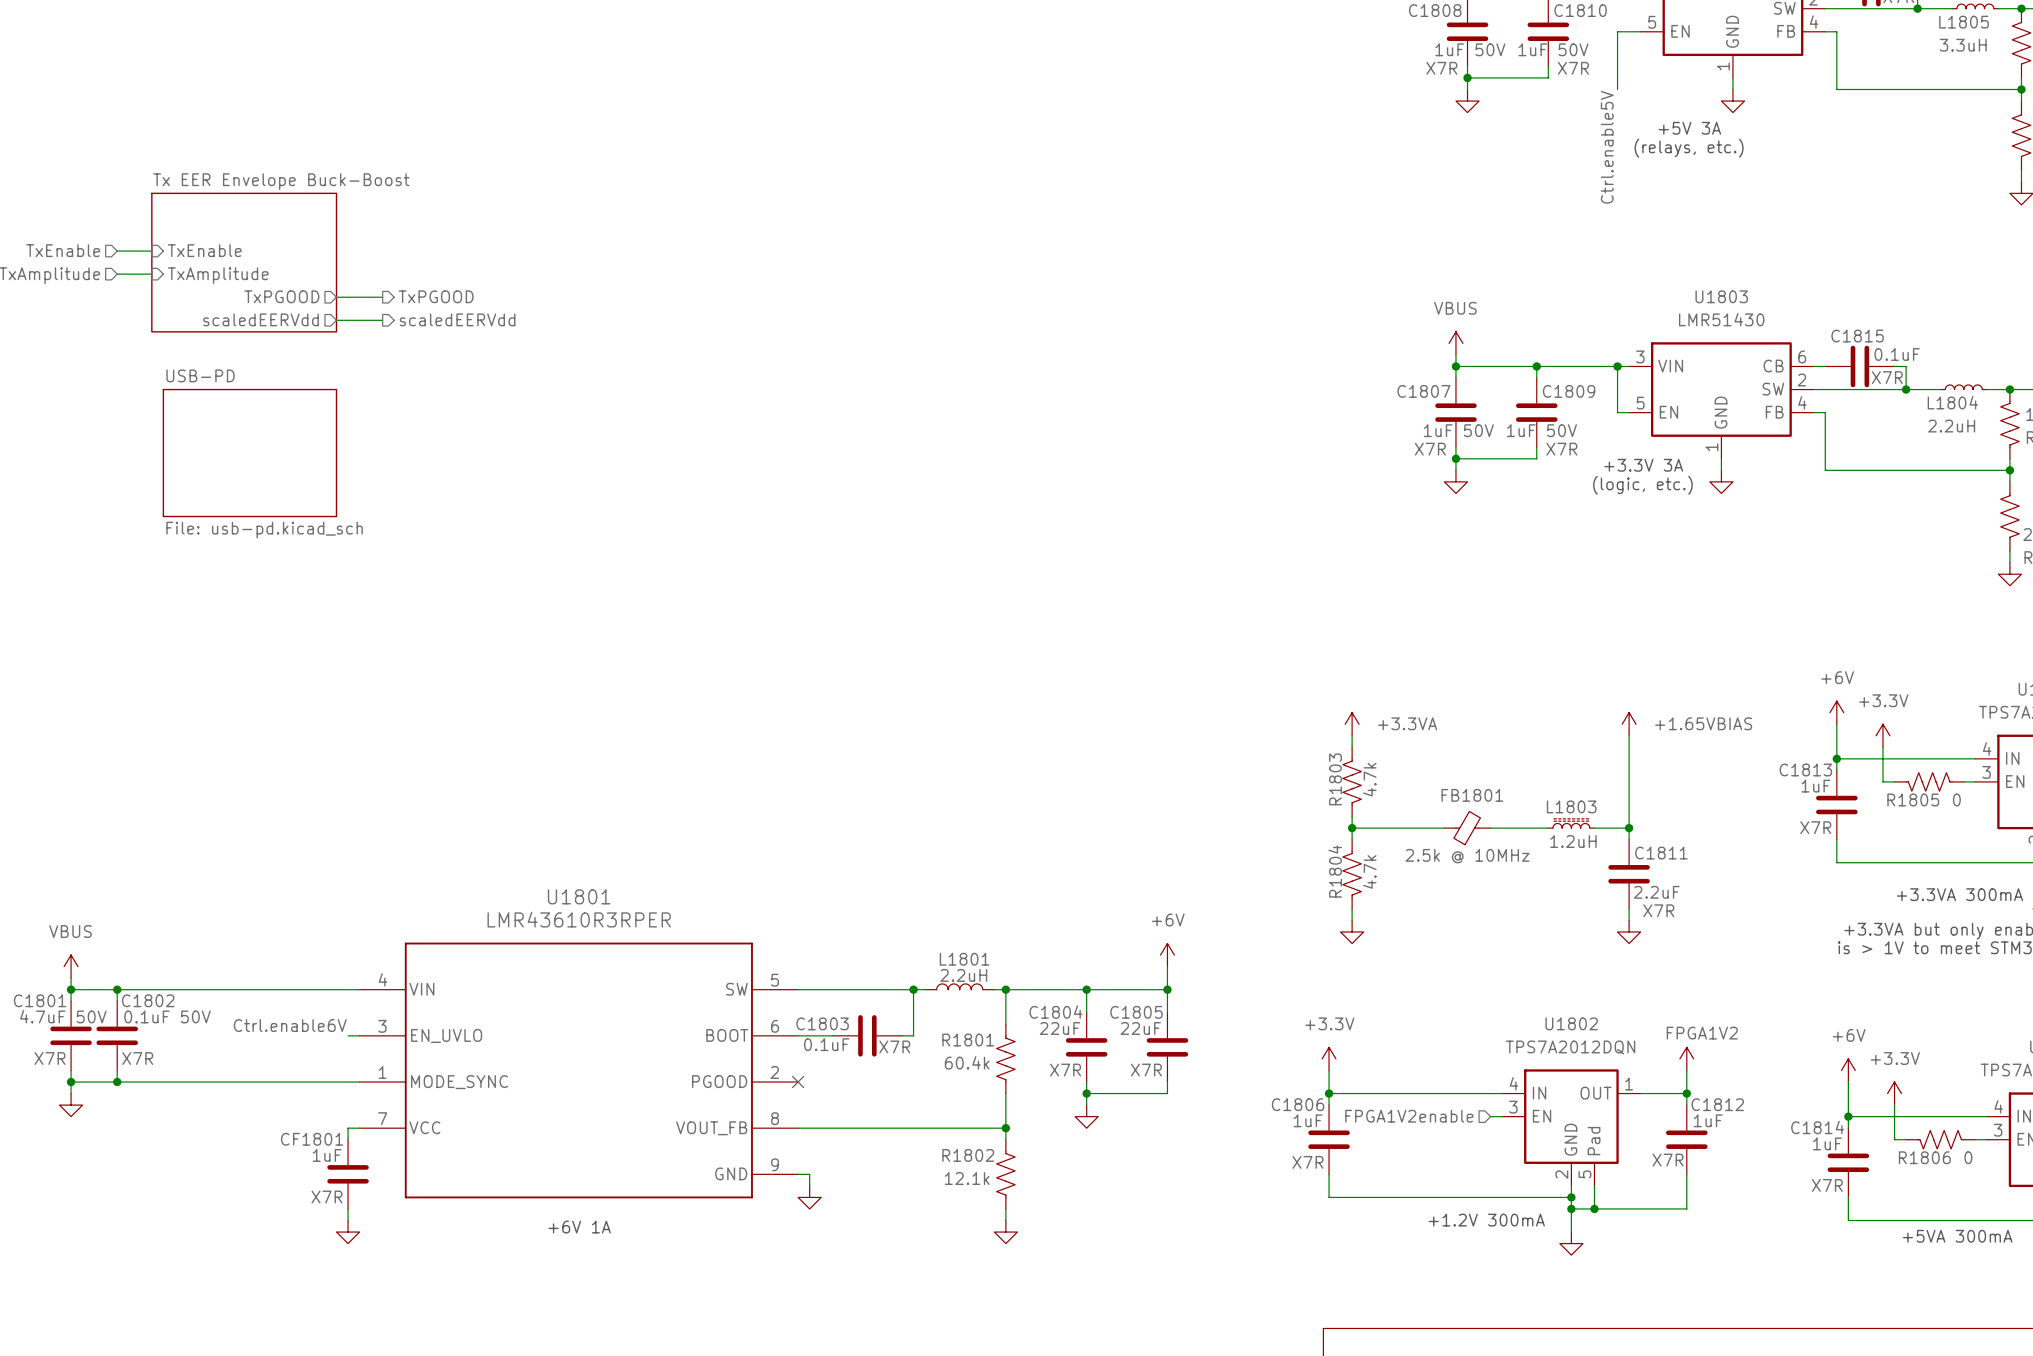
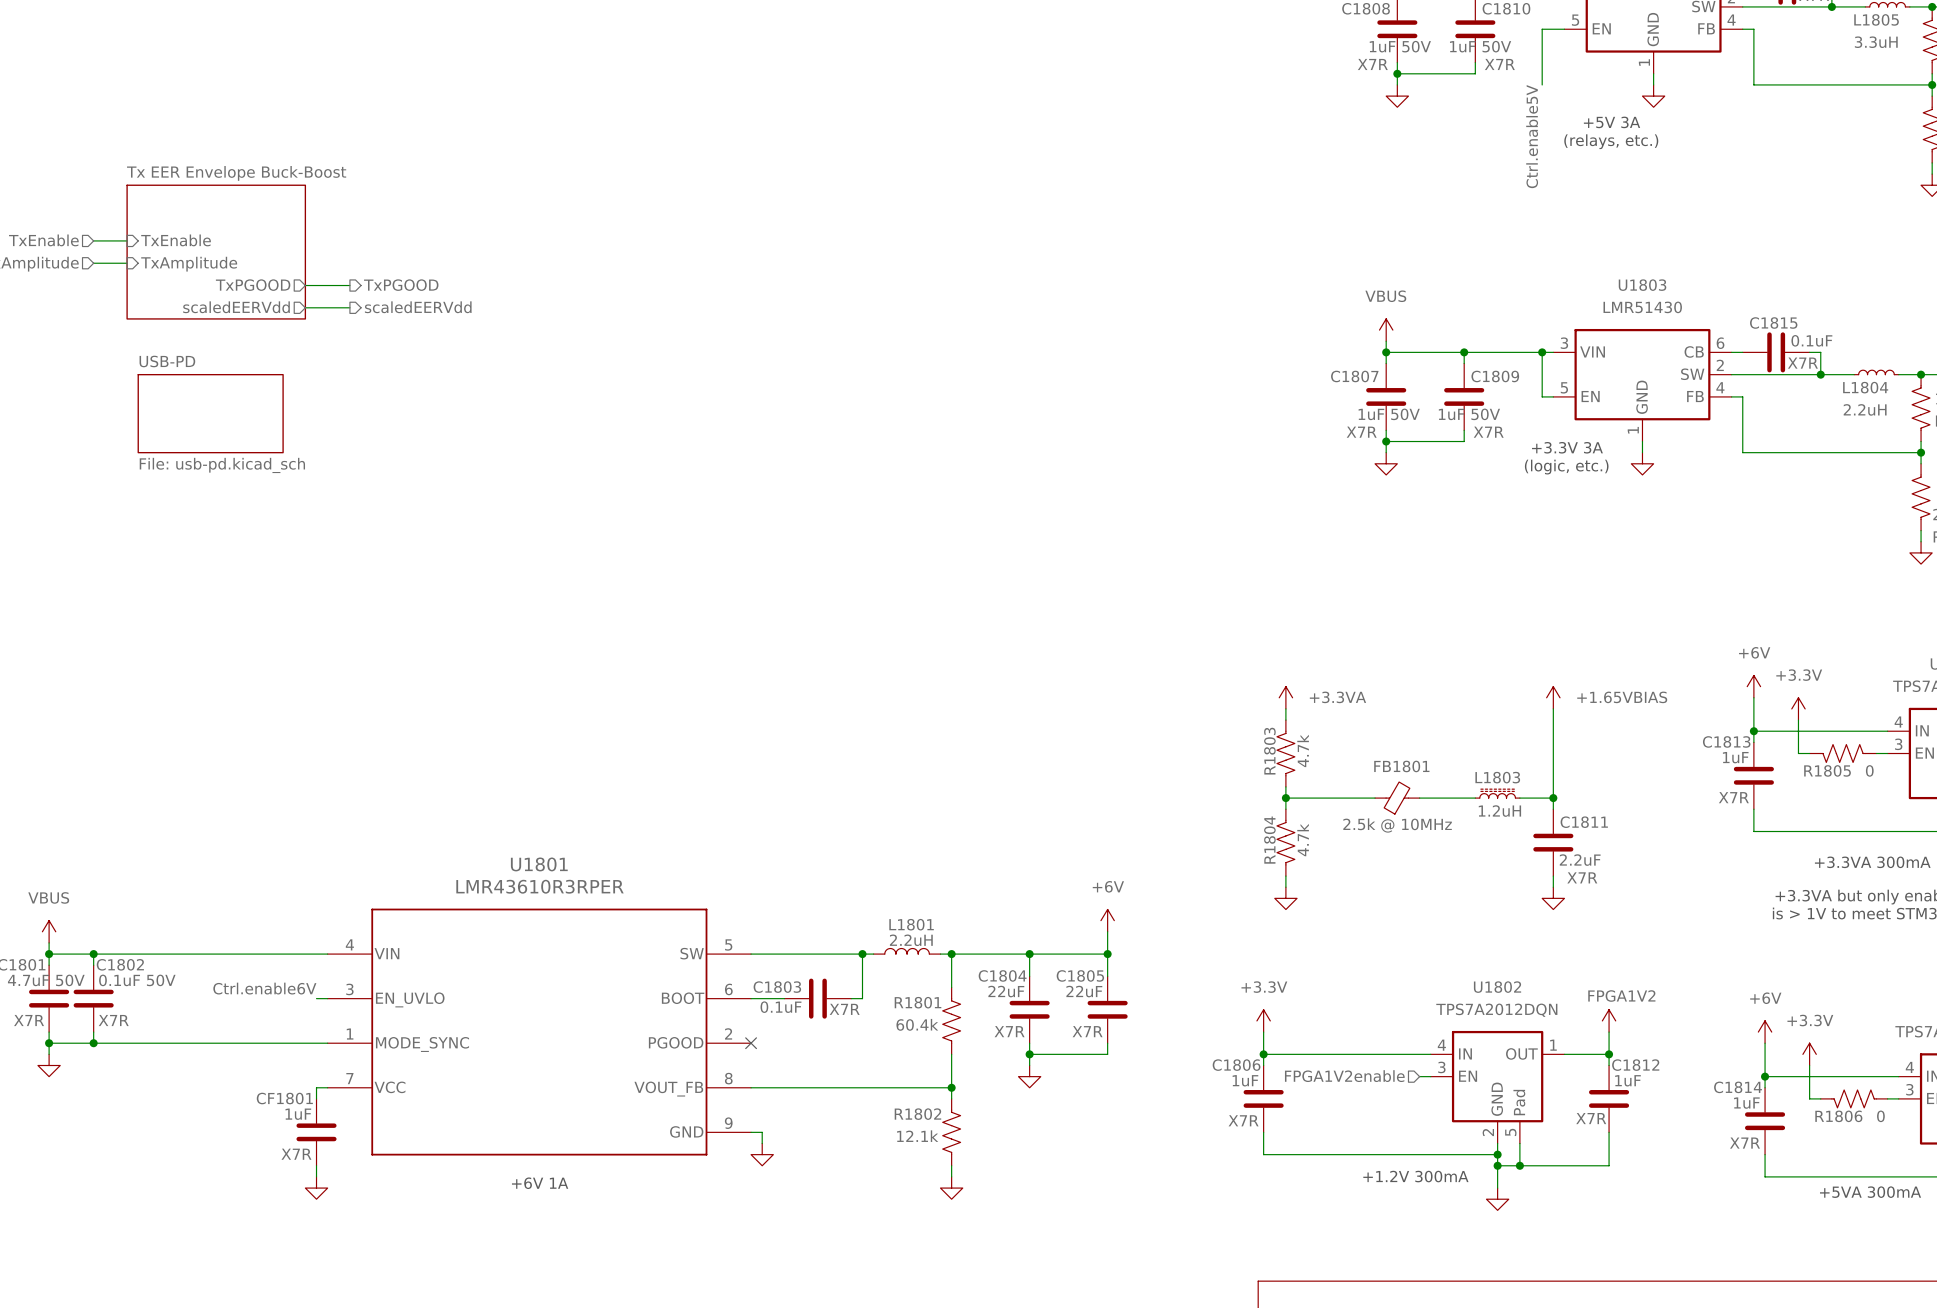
sheet USB-PD: none -> File: usb-pd.kicad_sch (210, 413)
sheet USB-PD: File: usb-pd.kicad_sch (249, 453) -> none

